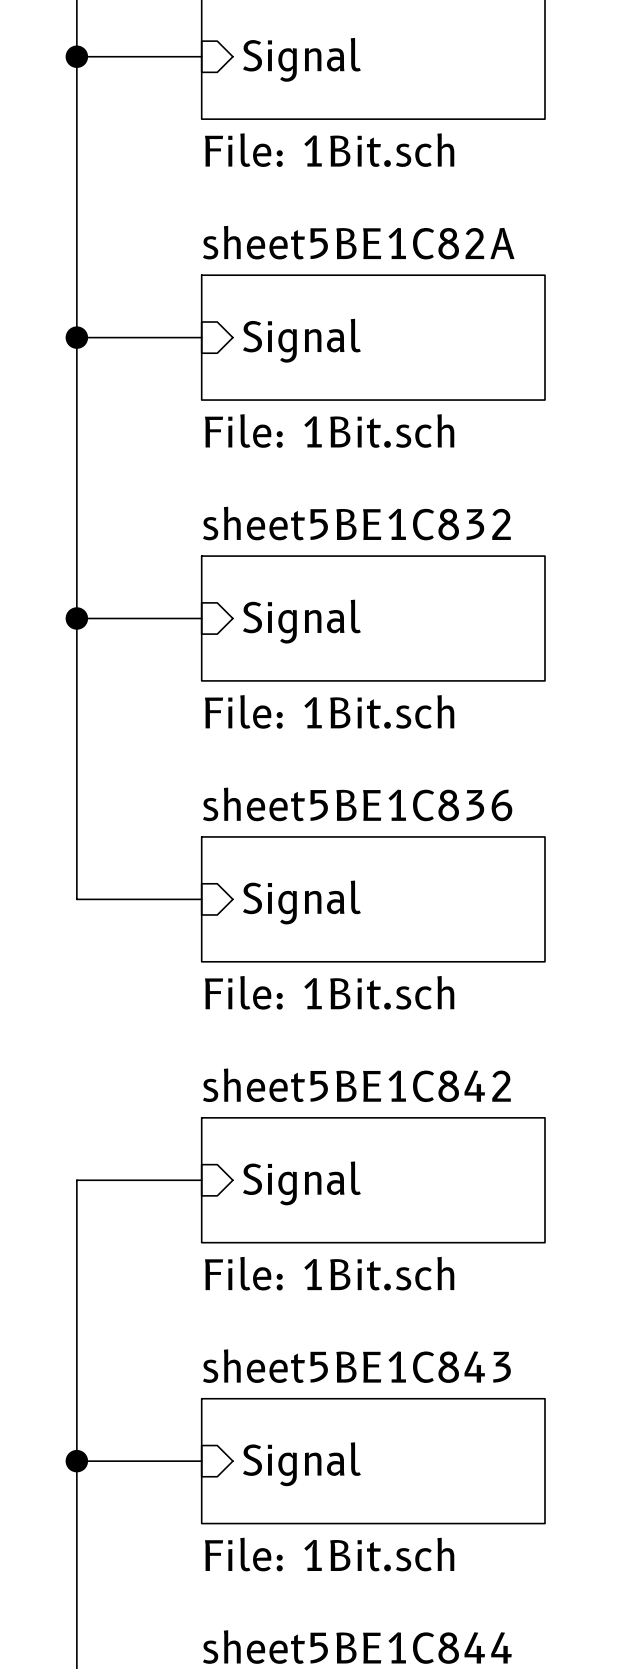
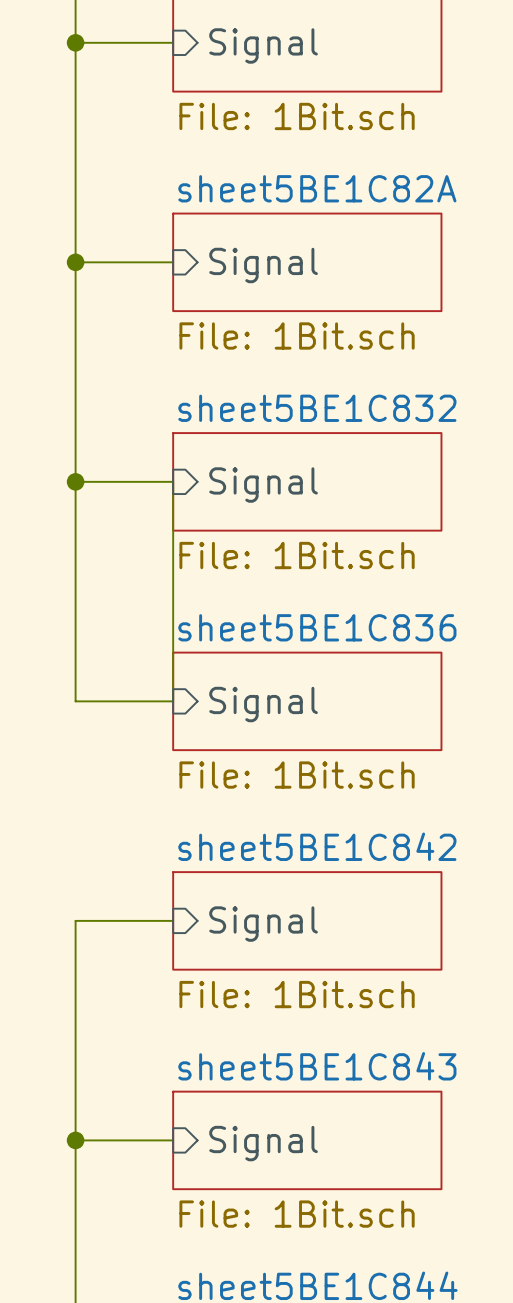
wire: none -> (173, 481) (173, 701)

